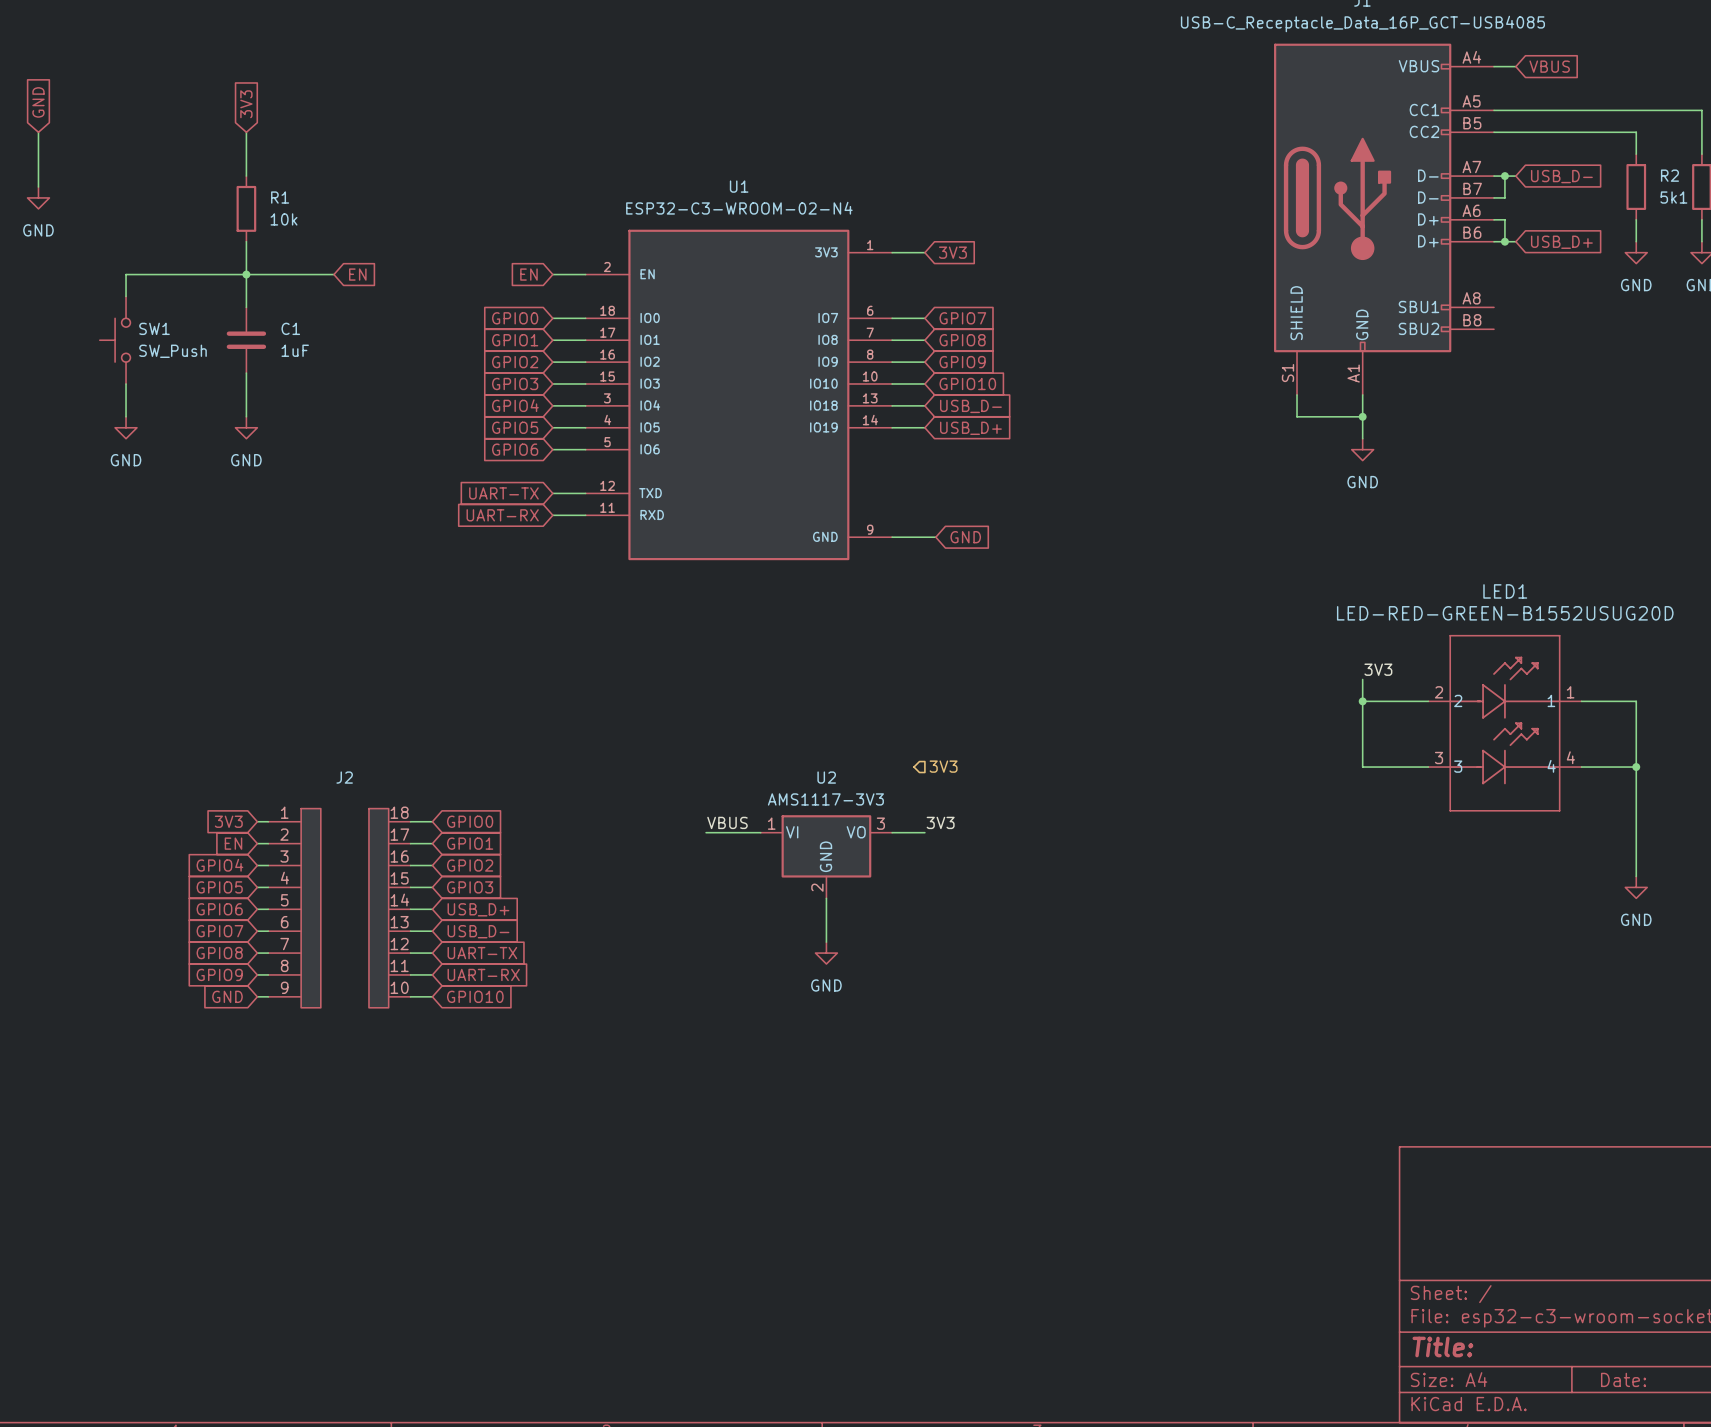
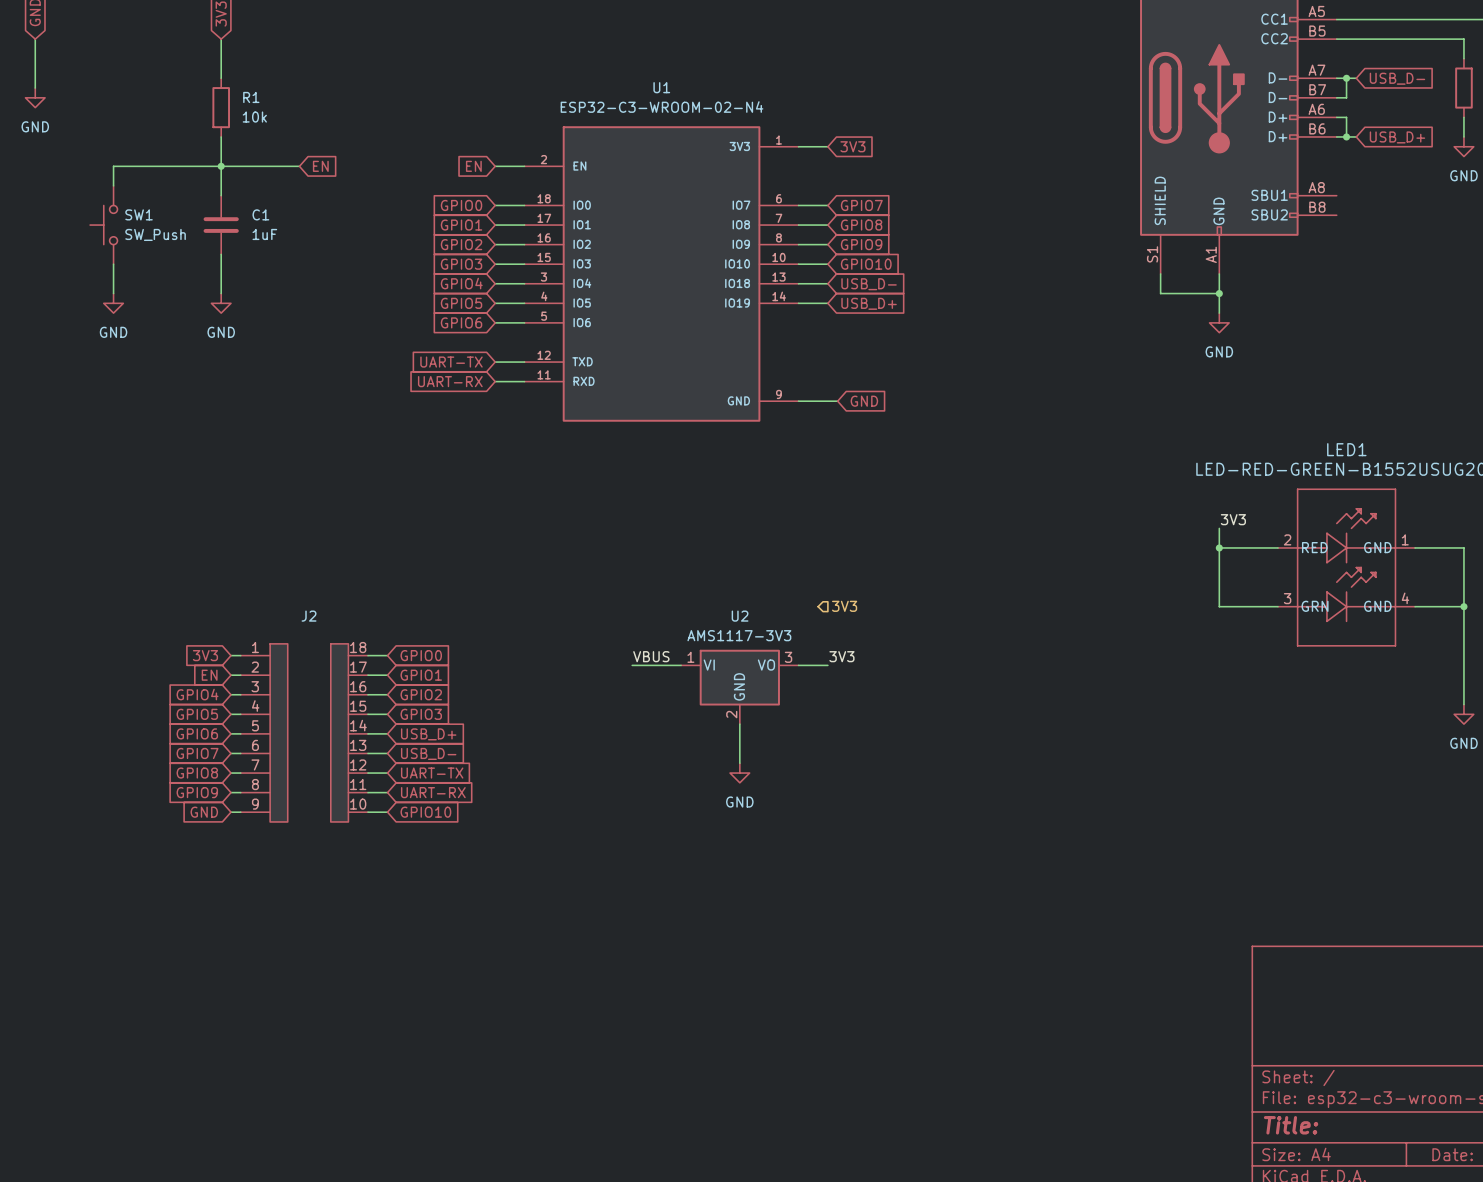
LED1 pin name: 2 (1458, 700) -> RED (1314, 547)
LED1 pin name: 1 (1551, 700) -> GND (1377, 547)
LED1 pin name: 3 (1458, 766) -> GRN (1315, 606)
LED1 pin name: 4 (1551, 766) -> GND (1377, 606)

